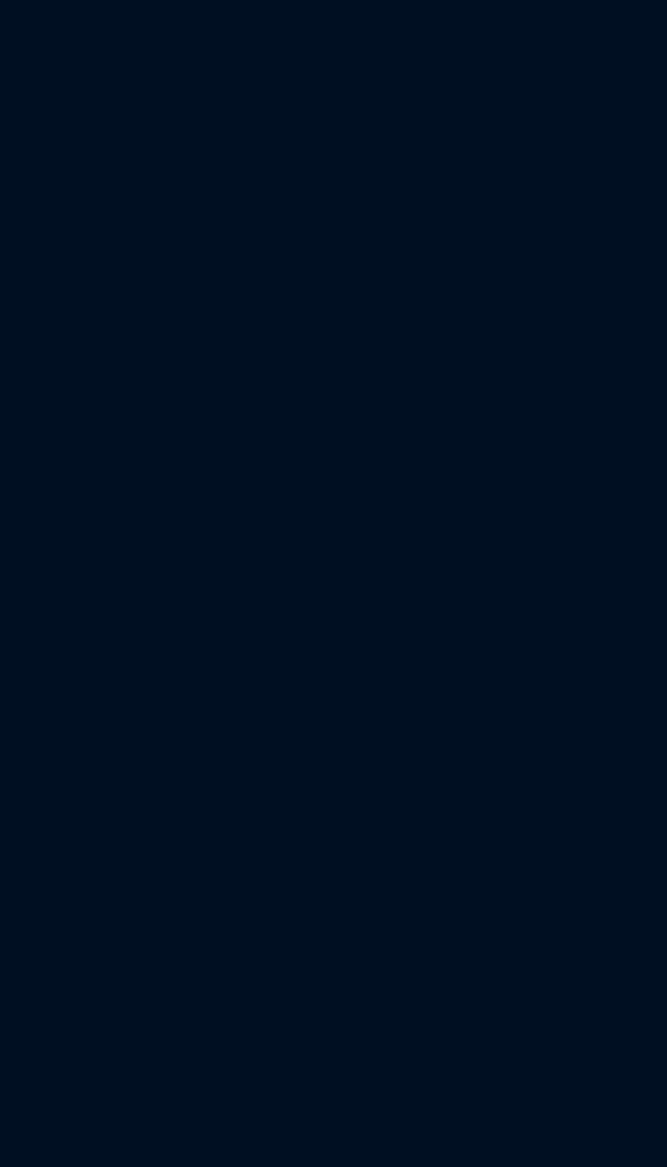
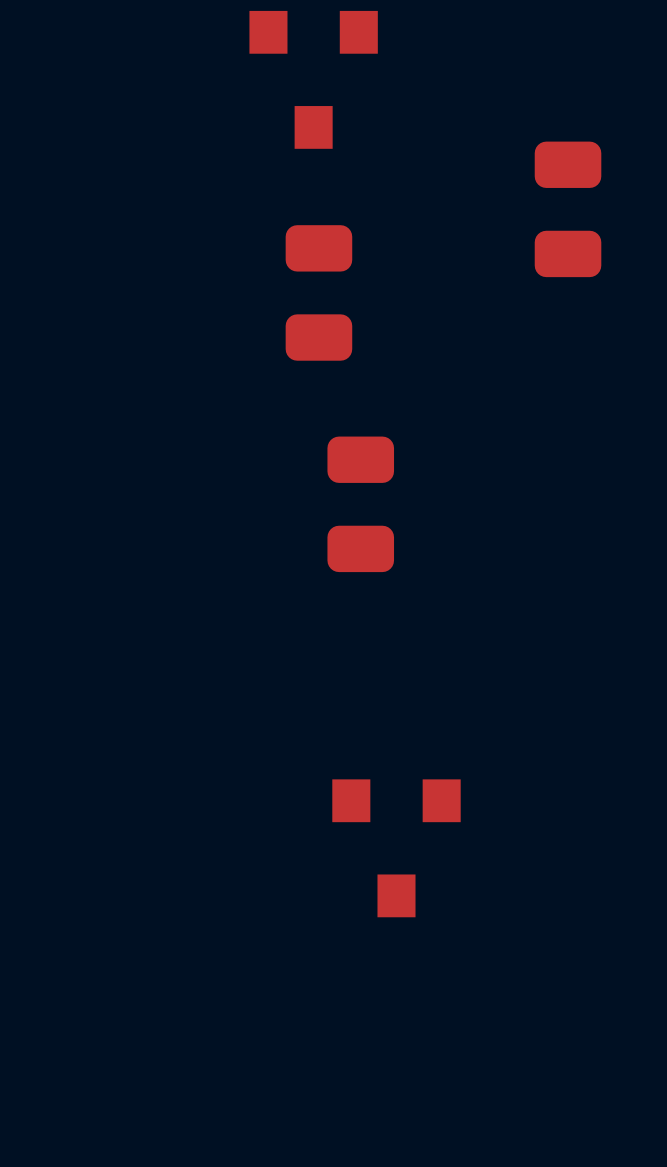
part: none -> (313, 79)
part: none -> (568, 209)
part: none -> (318, 292)
part: none -> (360, 504)
part: none -> (396, 848)

